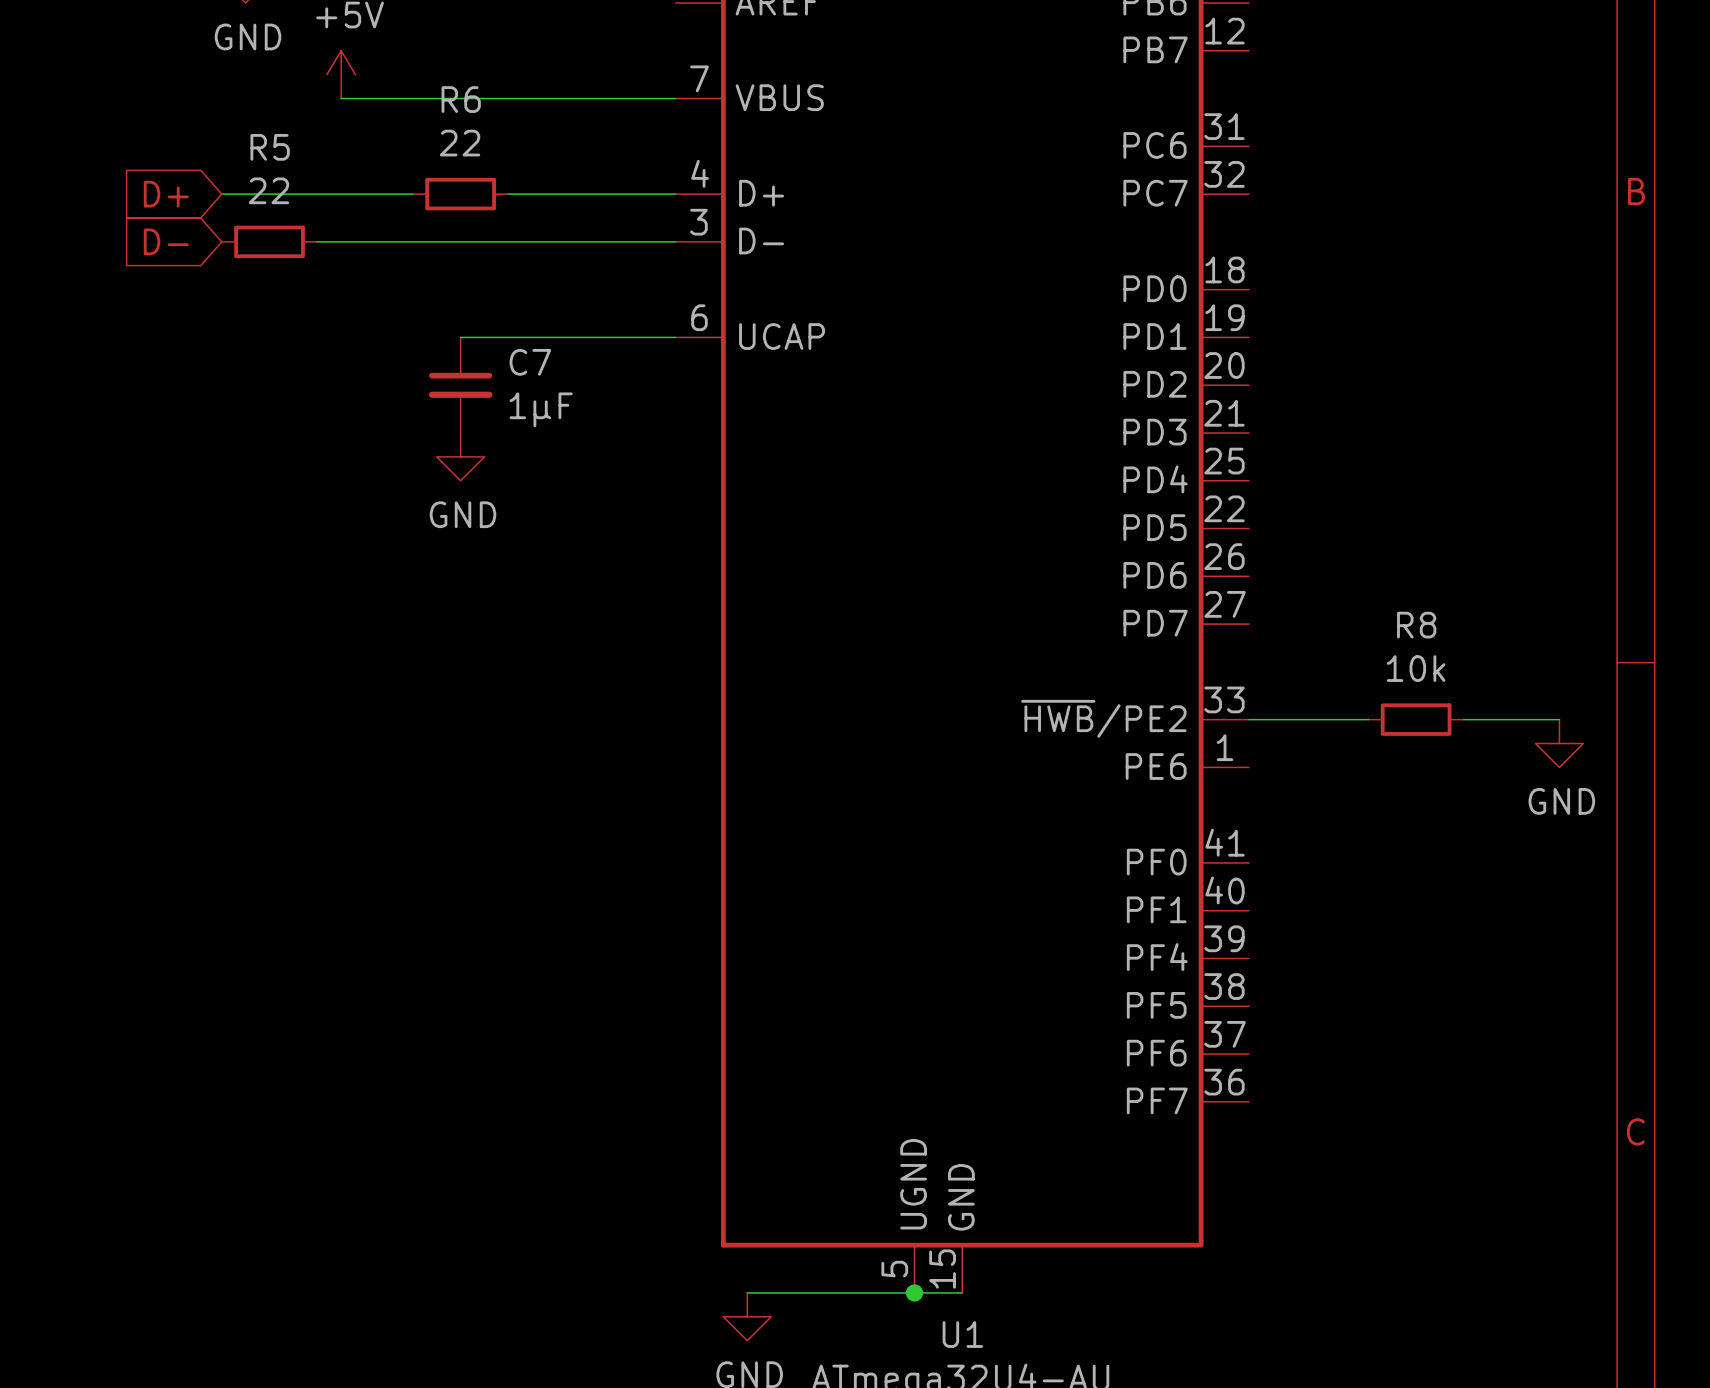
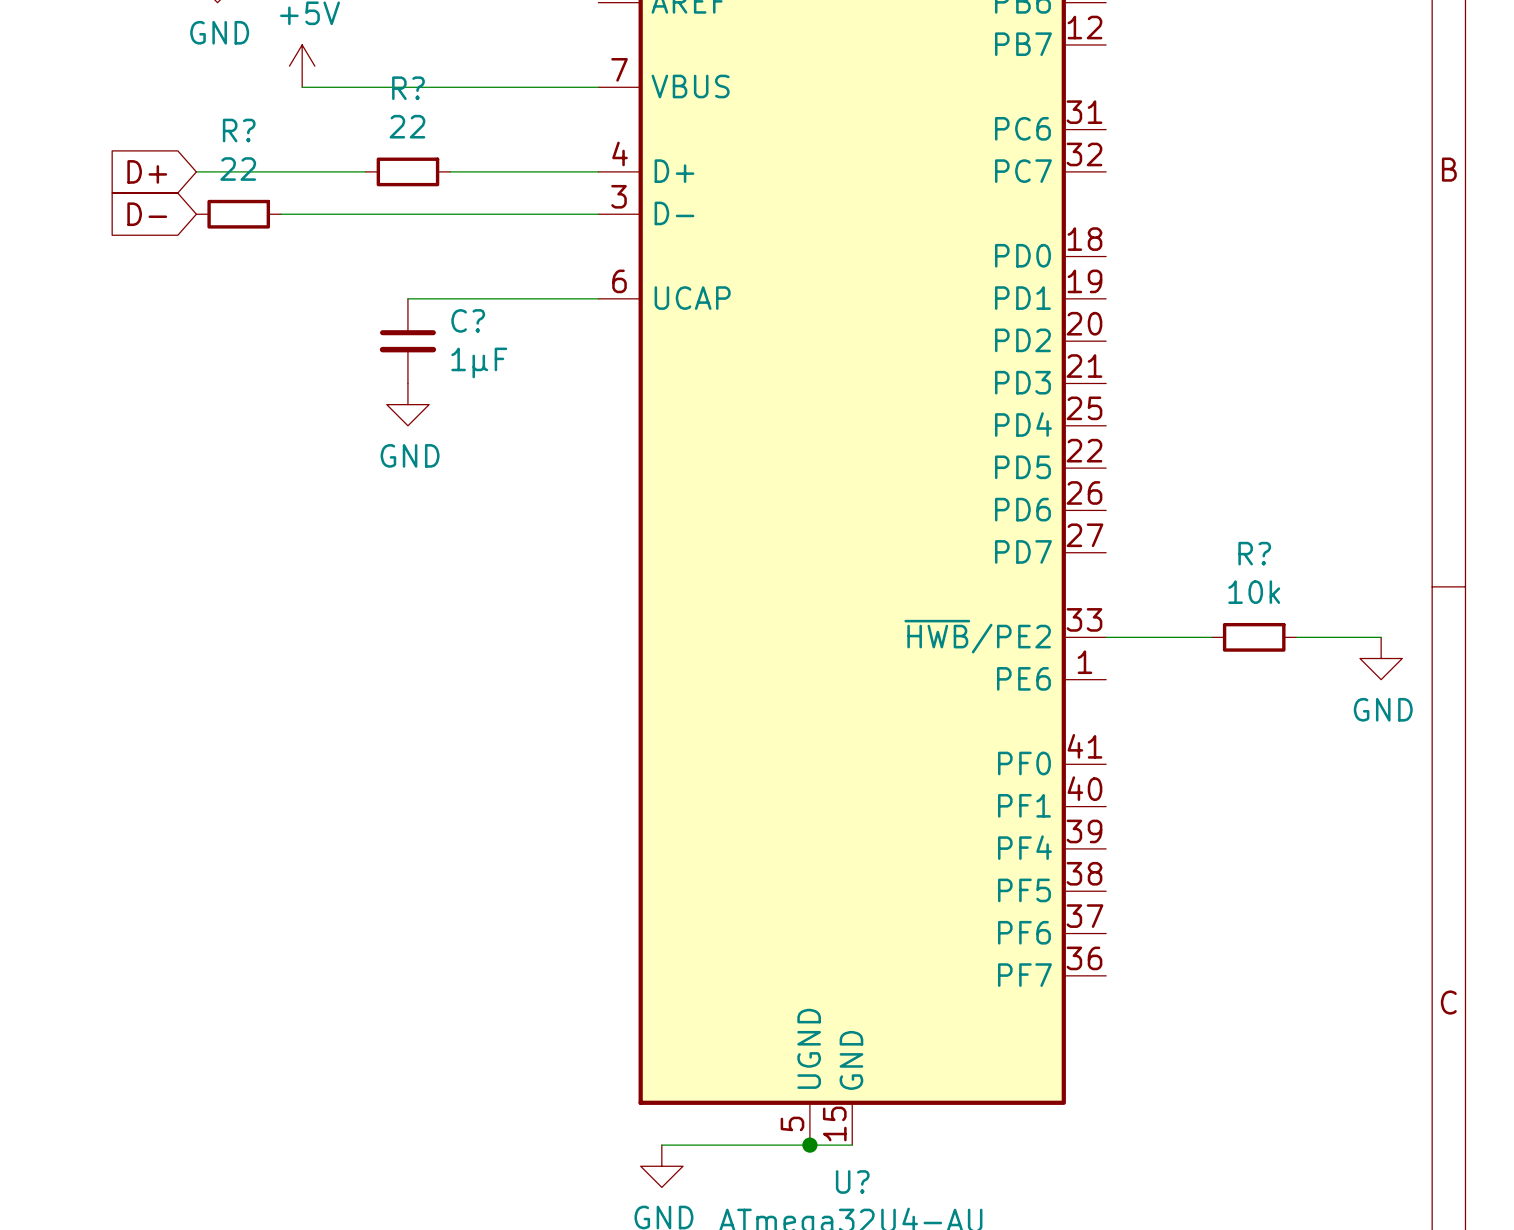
R6 name: R6 (461, 99) -> R? (408, 88)
R5 name: R5 (270, 147) -> R? (239, 130)
C7 name: C7 (530, 362) -> C? (468, 320)
R8 name: R8 (1416, 625) -> R? (1254, 553)
U1 name: U1 (962, 1334) -> U? (852, 1181)

